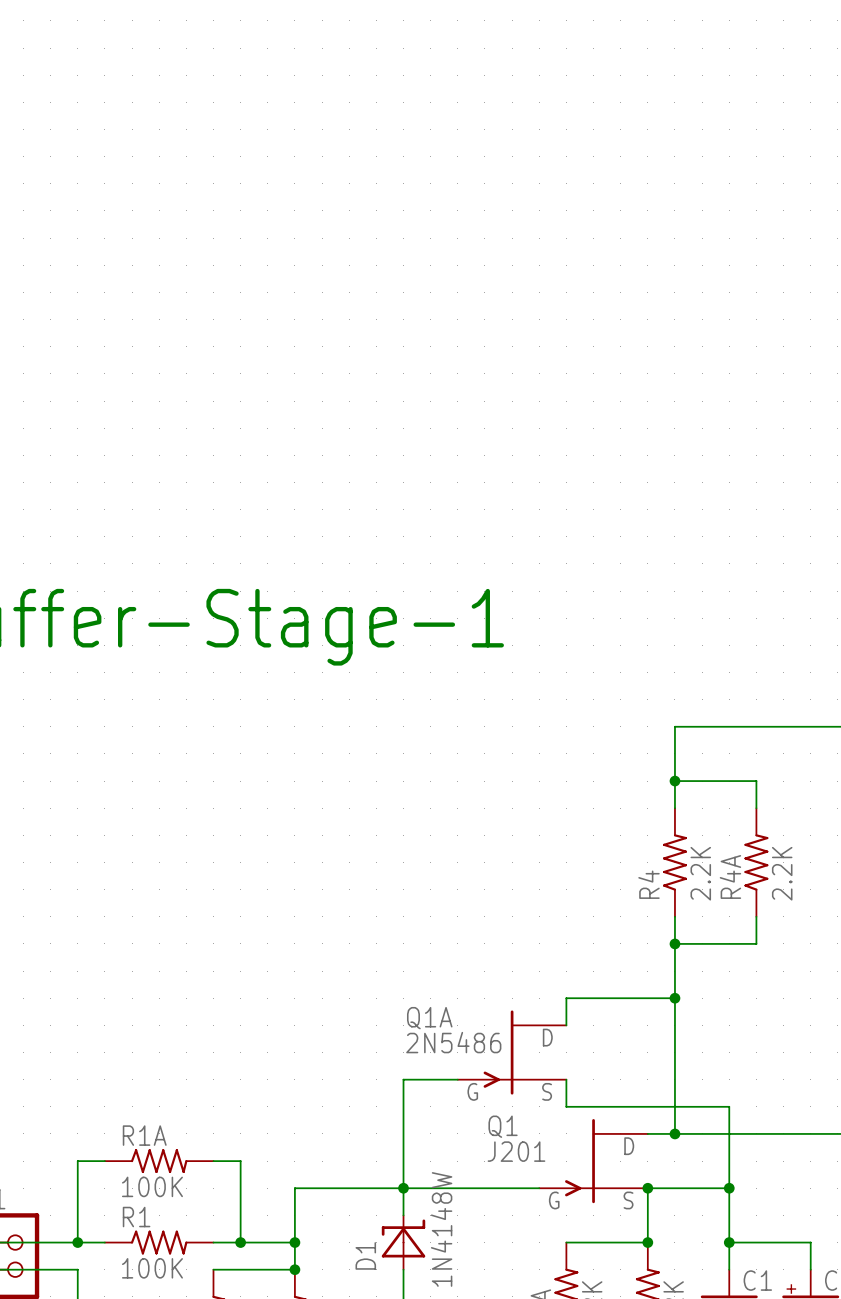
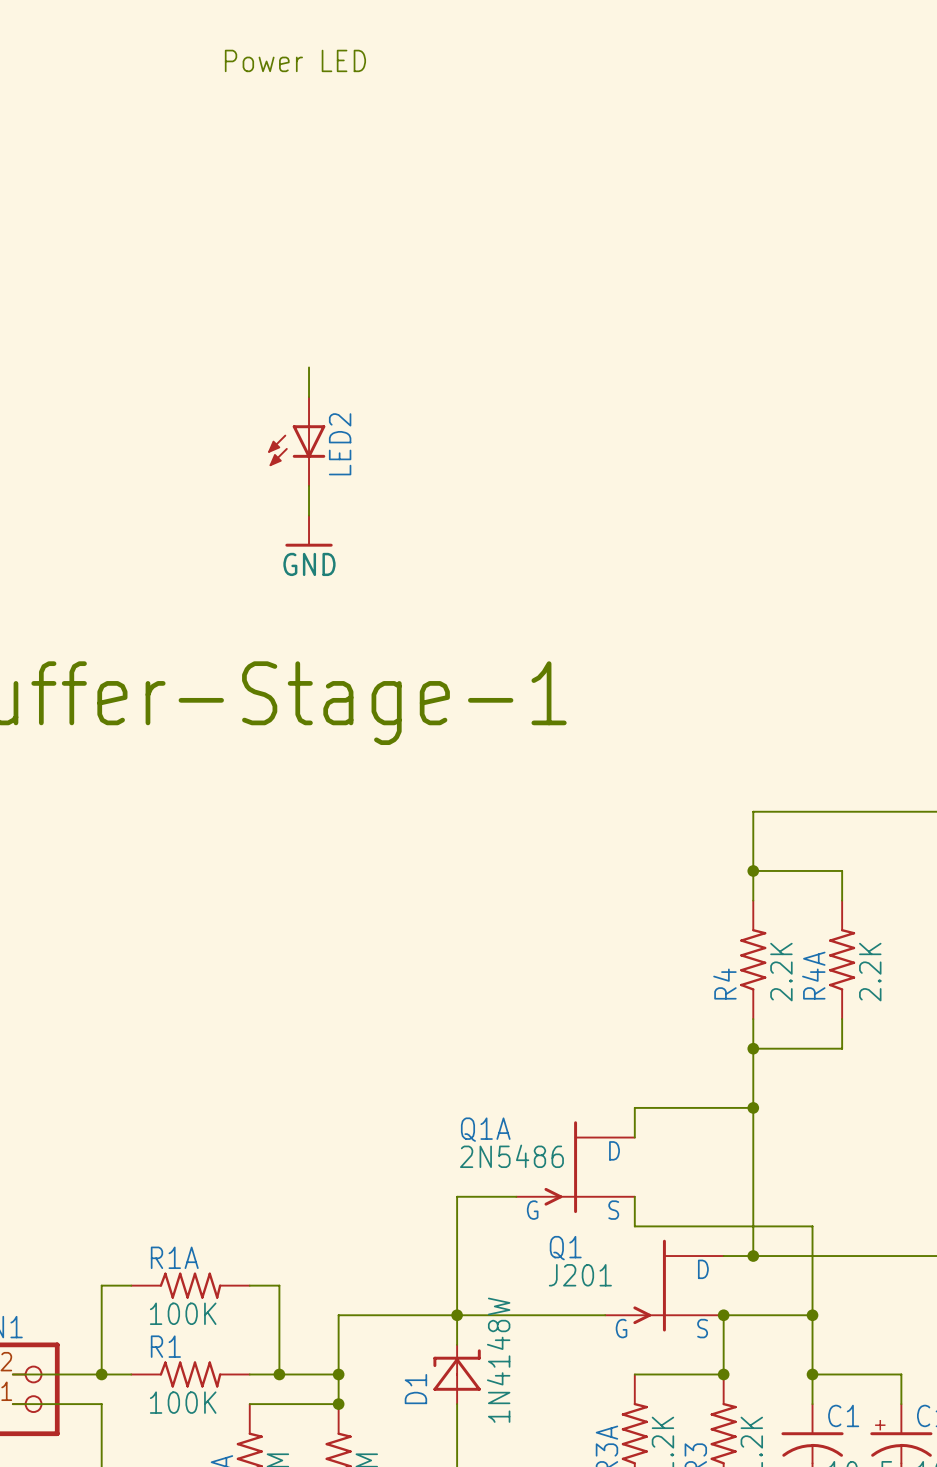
text: none -> Power LED (295, 60)
wire: none -> (309, 367) (309, 397)
LED2: none -> (296, 441)
wire: none -> (309, 485) (309, 515)
power symbol: none -> GND (309, 531)

